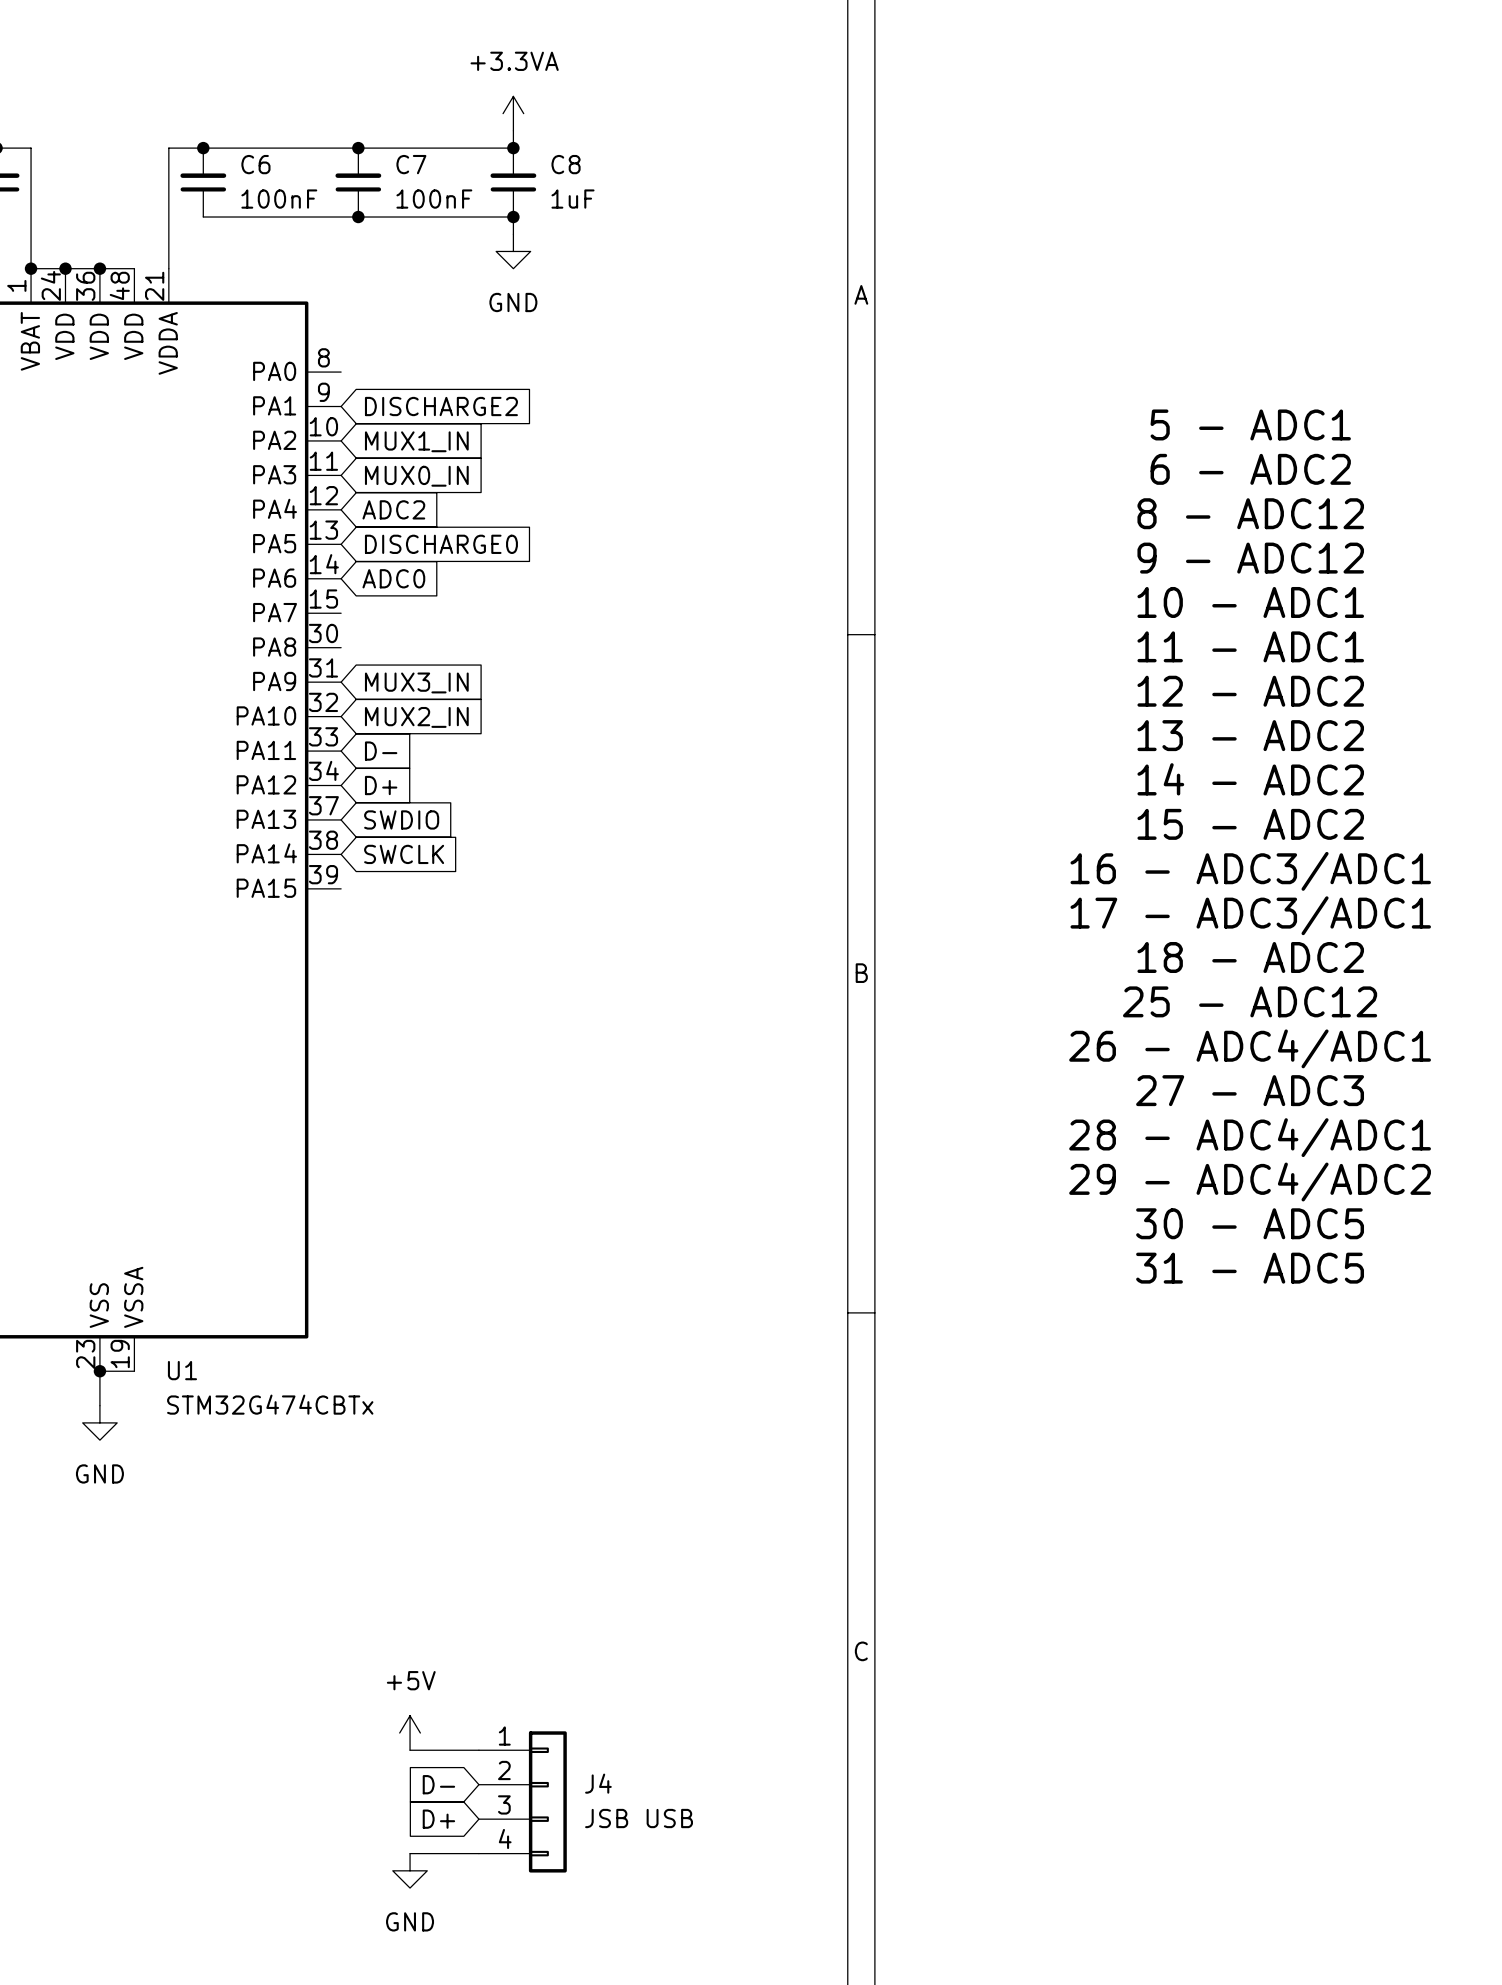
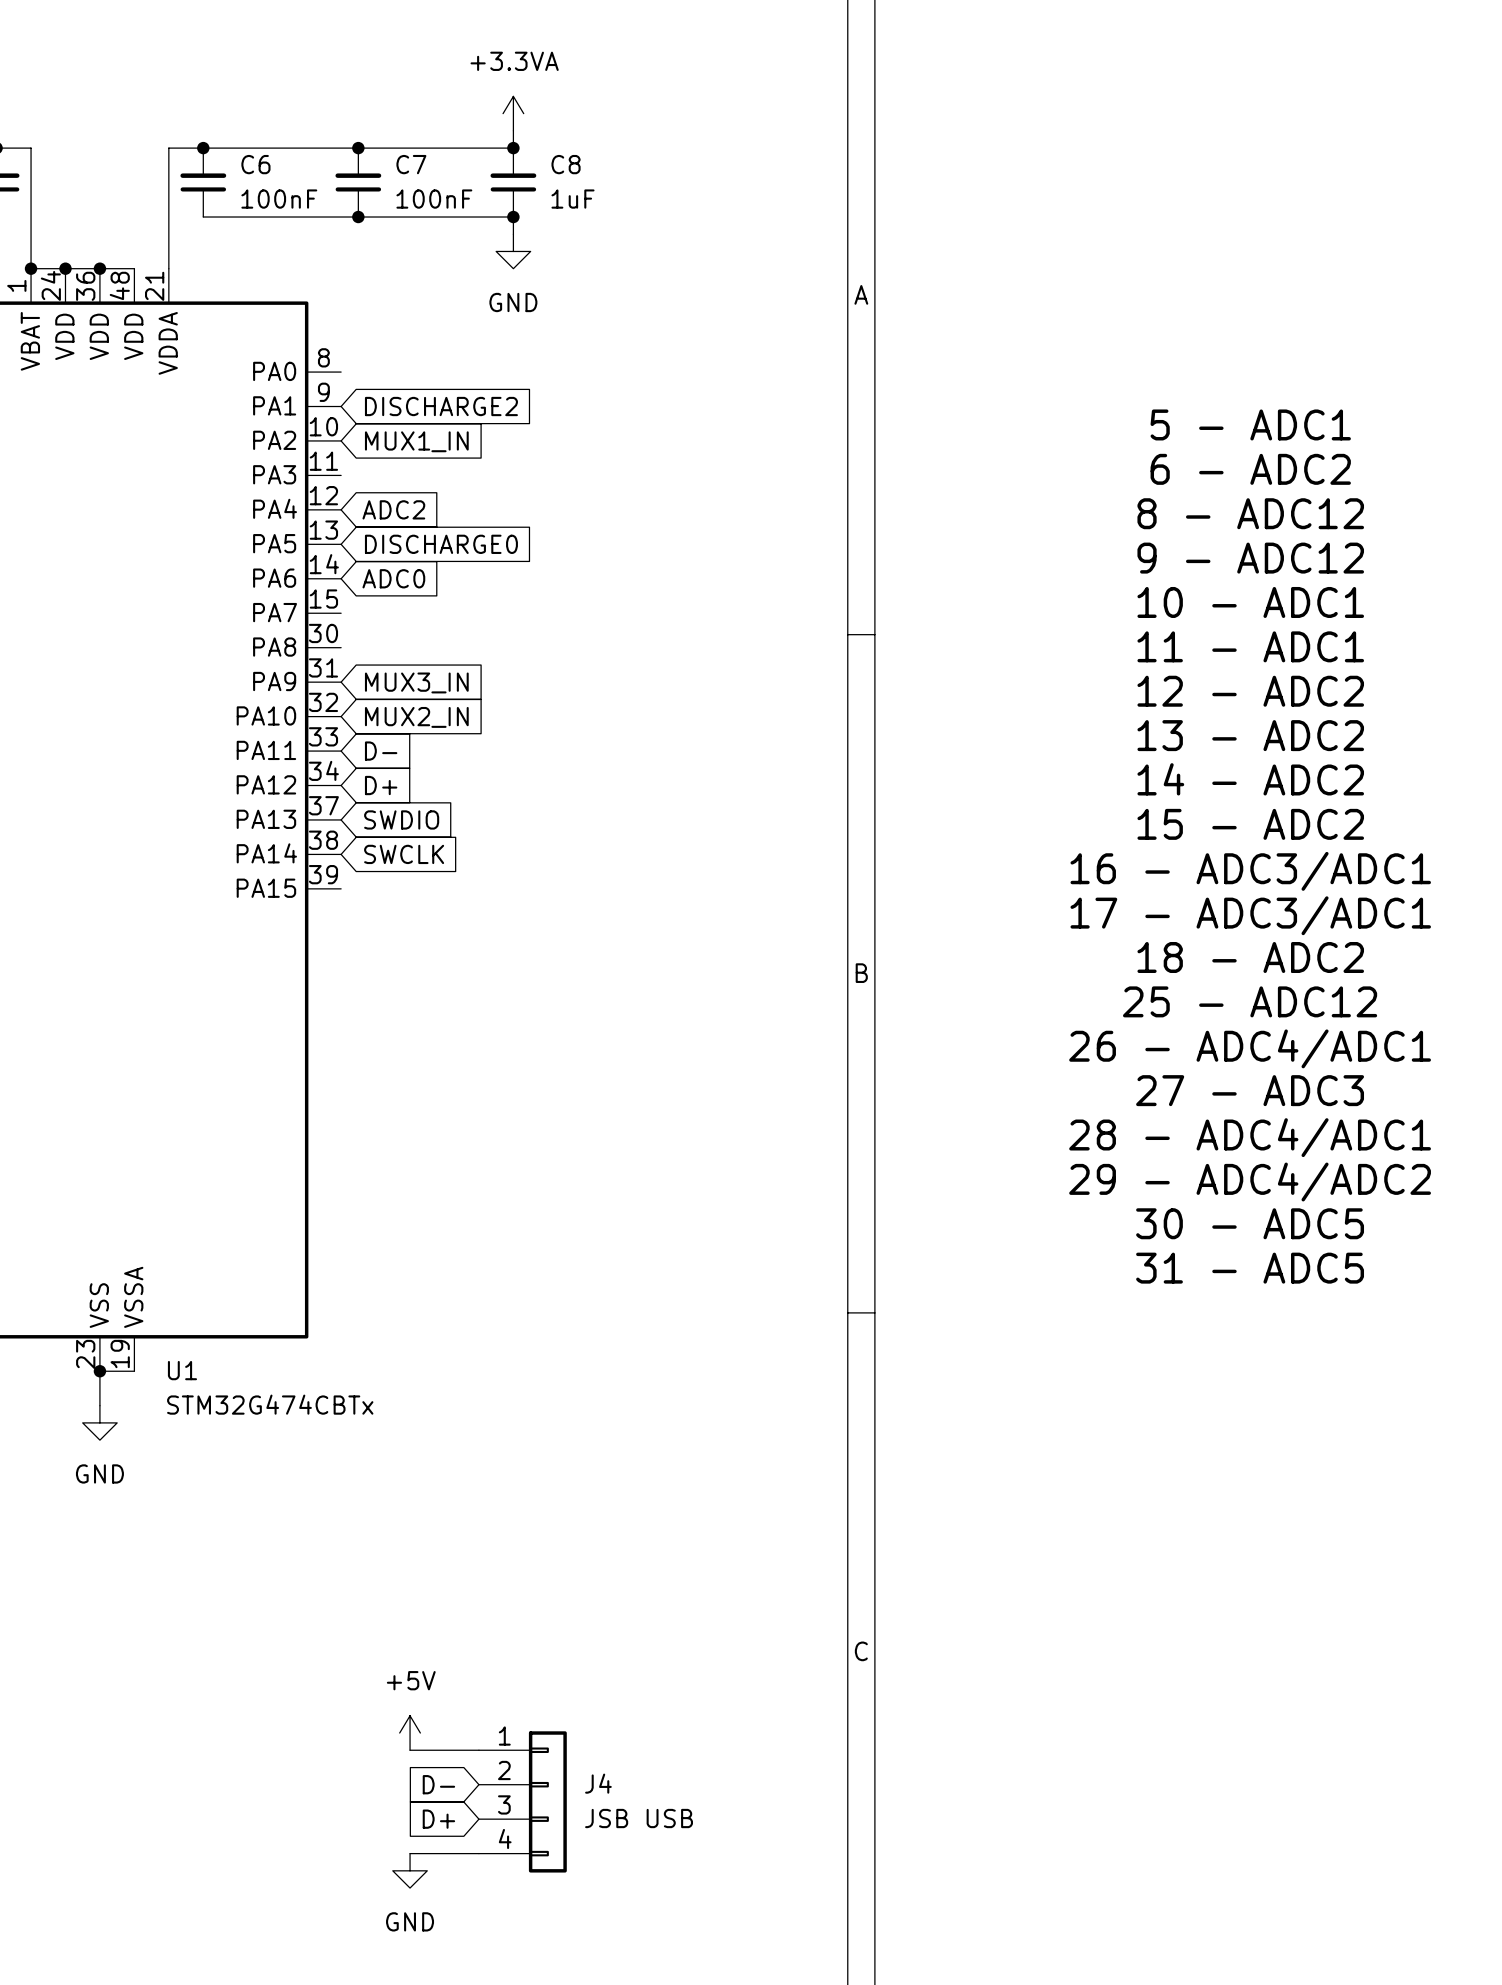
global label: MUX0_IN (416, 476) -> none

